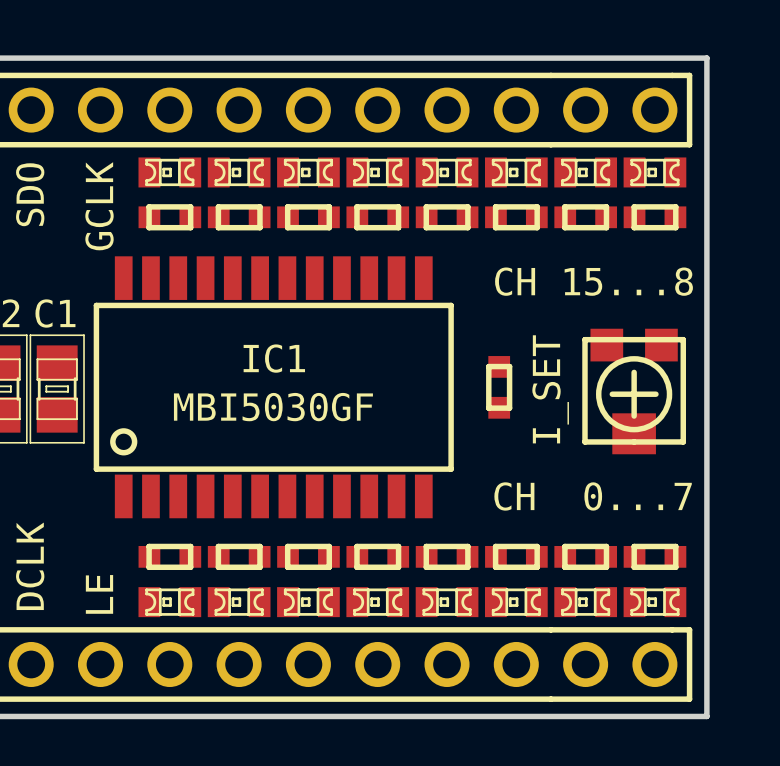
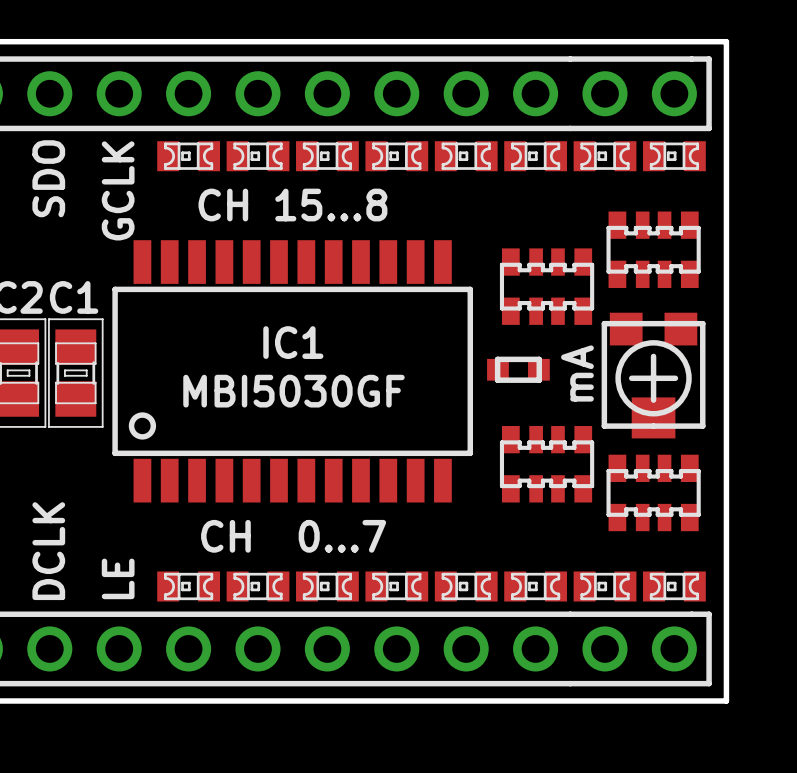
part: (169, 217) -> none
part: (239, 217) -> none
part: (308, 217) -> none
part: (377, 217) -> none
part: (447, 217) -> none
part: (516, 217) -> none
part: (585, 217) -> none
part: (654, 217) -> none
part: none -> (653, 249)
text position: CH 15...8 (594, 281) -> CH 15...8 (292, 205)
part: none -> (547, 286)
part rotation: 0° (499, 387) -> 90° clockwise (518, 369)
text: I_SET (550, 389) -> mA (577, 373)
part: none -> (547, 464)
text position: CH 0...7 (593, 496) -> CH 0...7 (293, 536)
part: none -> (653, 492)
part: (169, 556) -> none
part: (239, 556) -> none
part: (308, 556) -> none
part: (377, 556) -> none
part: (447, 556) -> none
part: (516, 556) -> none
part: (585, 556) -> none
part: (654, 556) -> none

